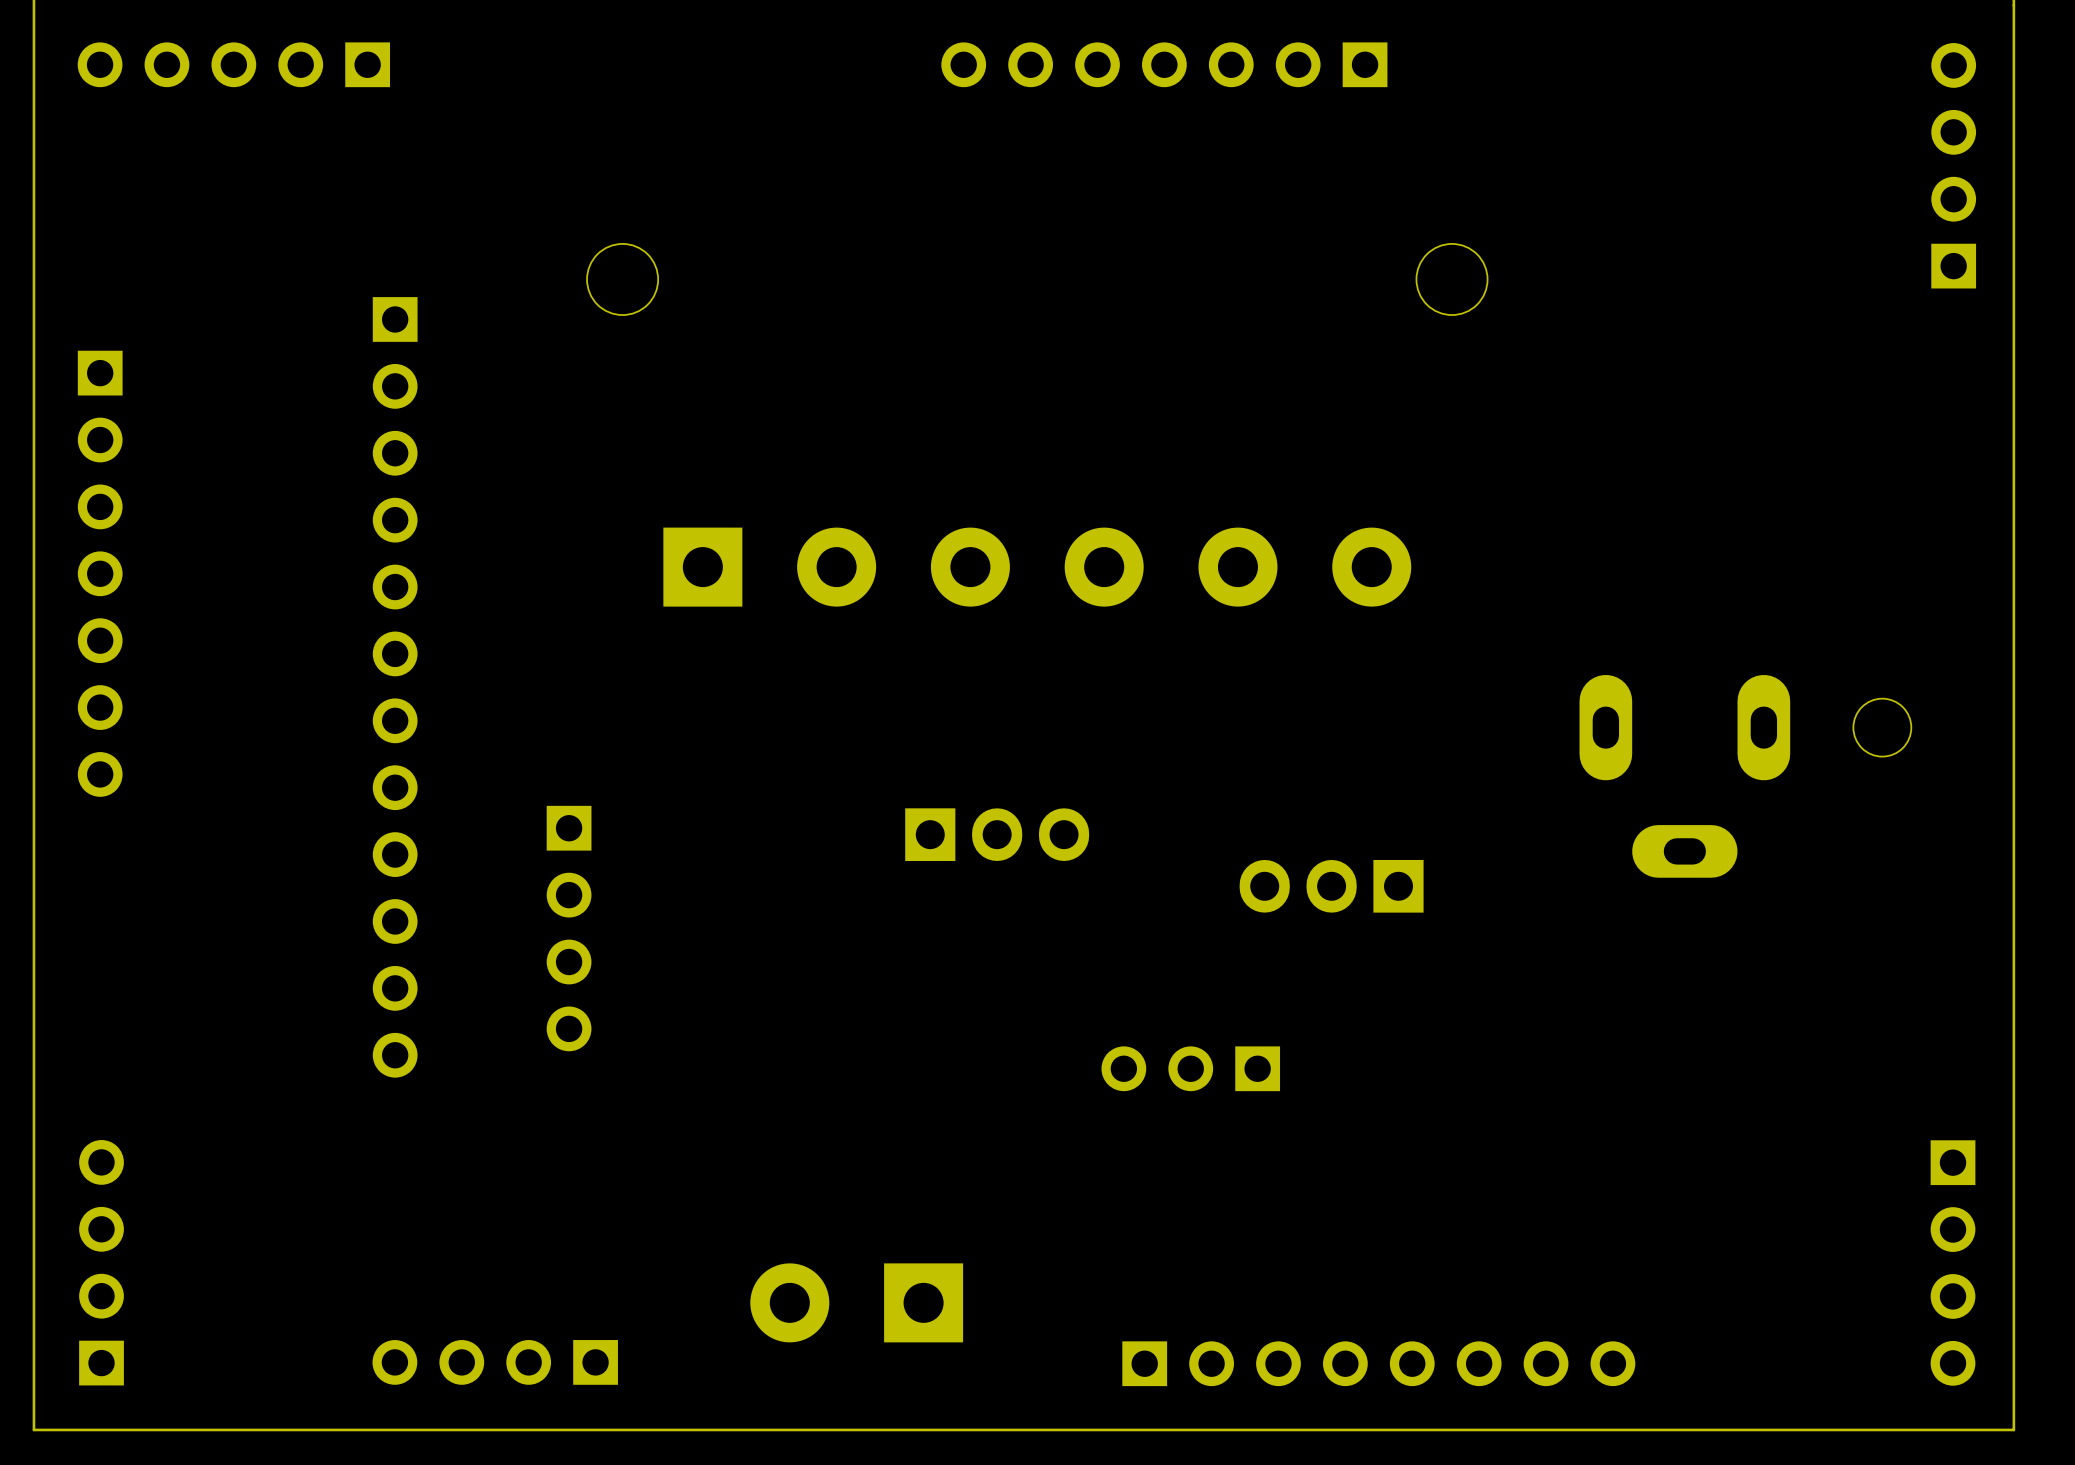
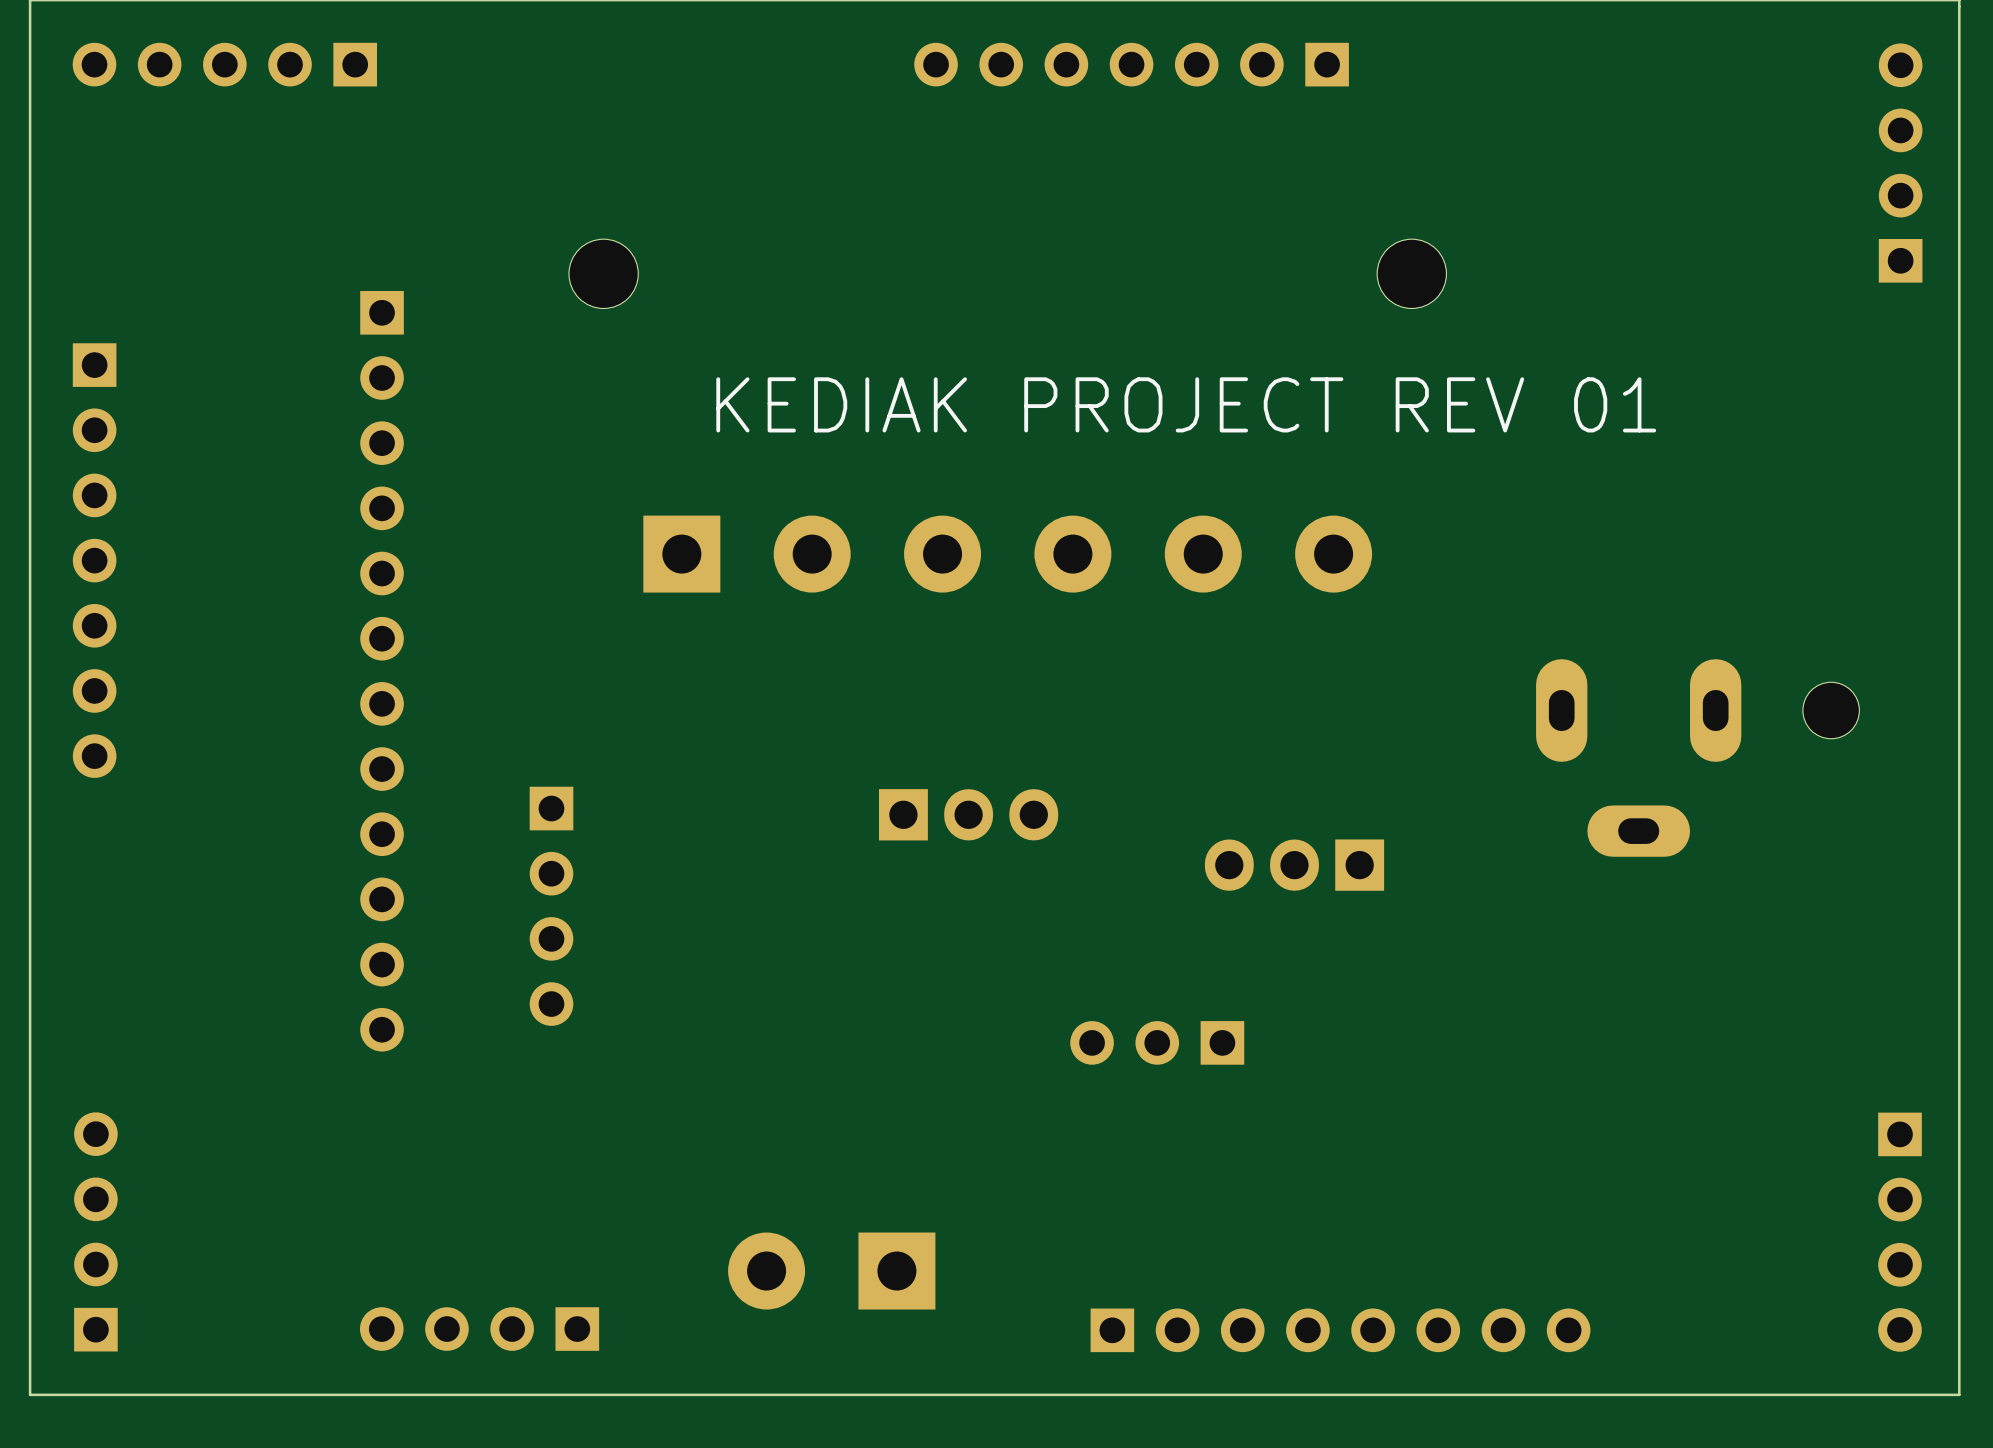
text: none -> KEDIAK PROJECT REV 01 (1186, 404)

